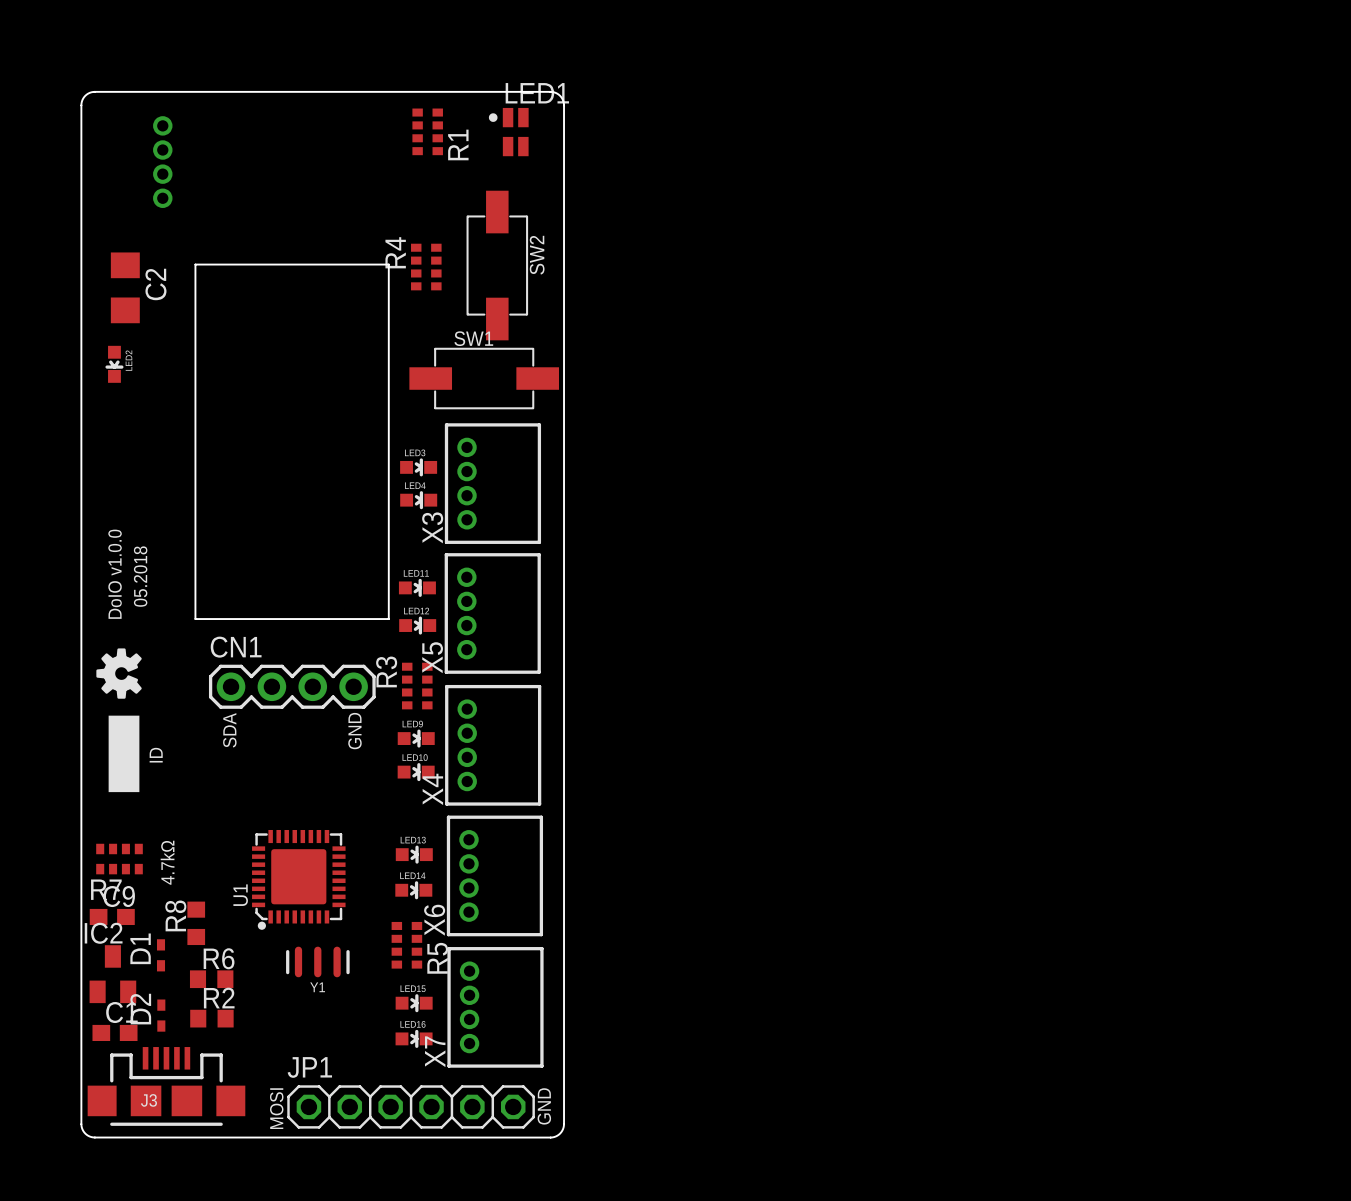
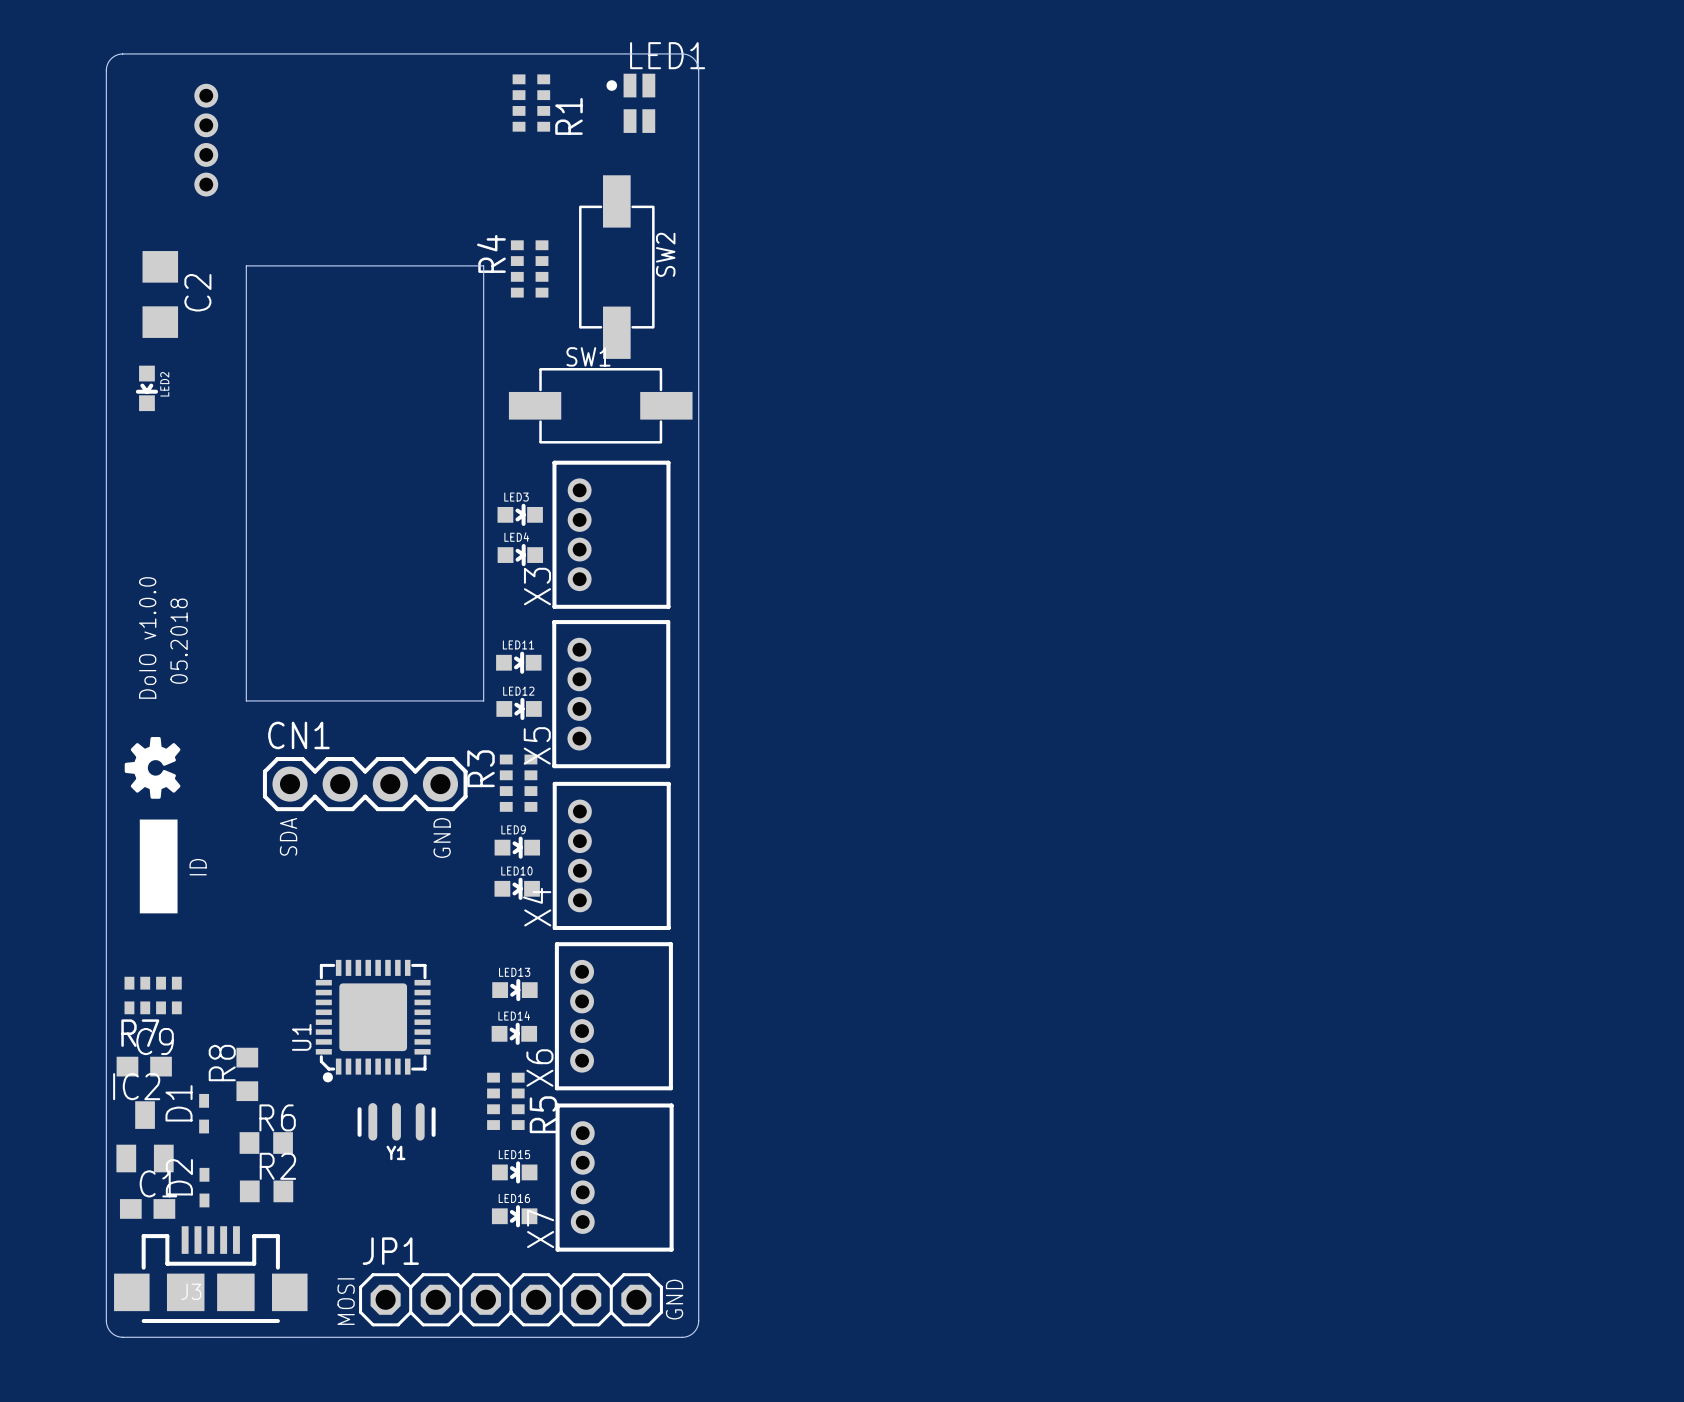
text: 4.7kΩ (167, 862) -> none

